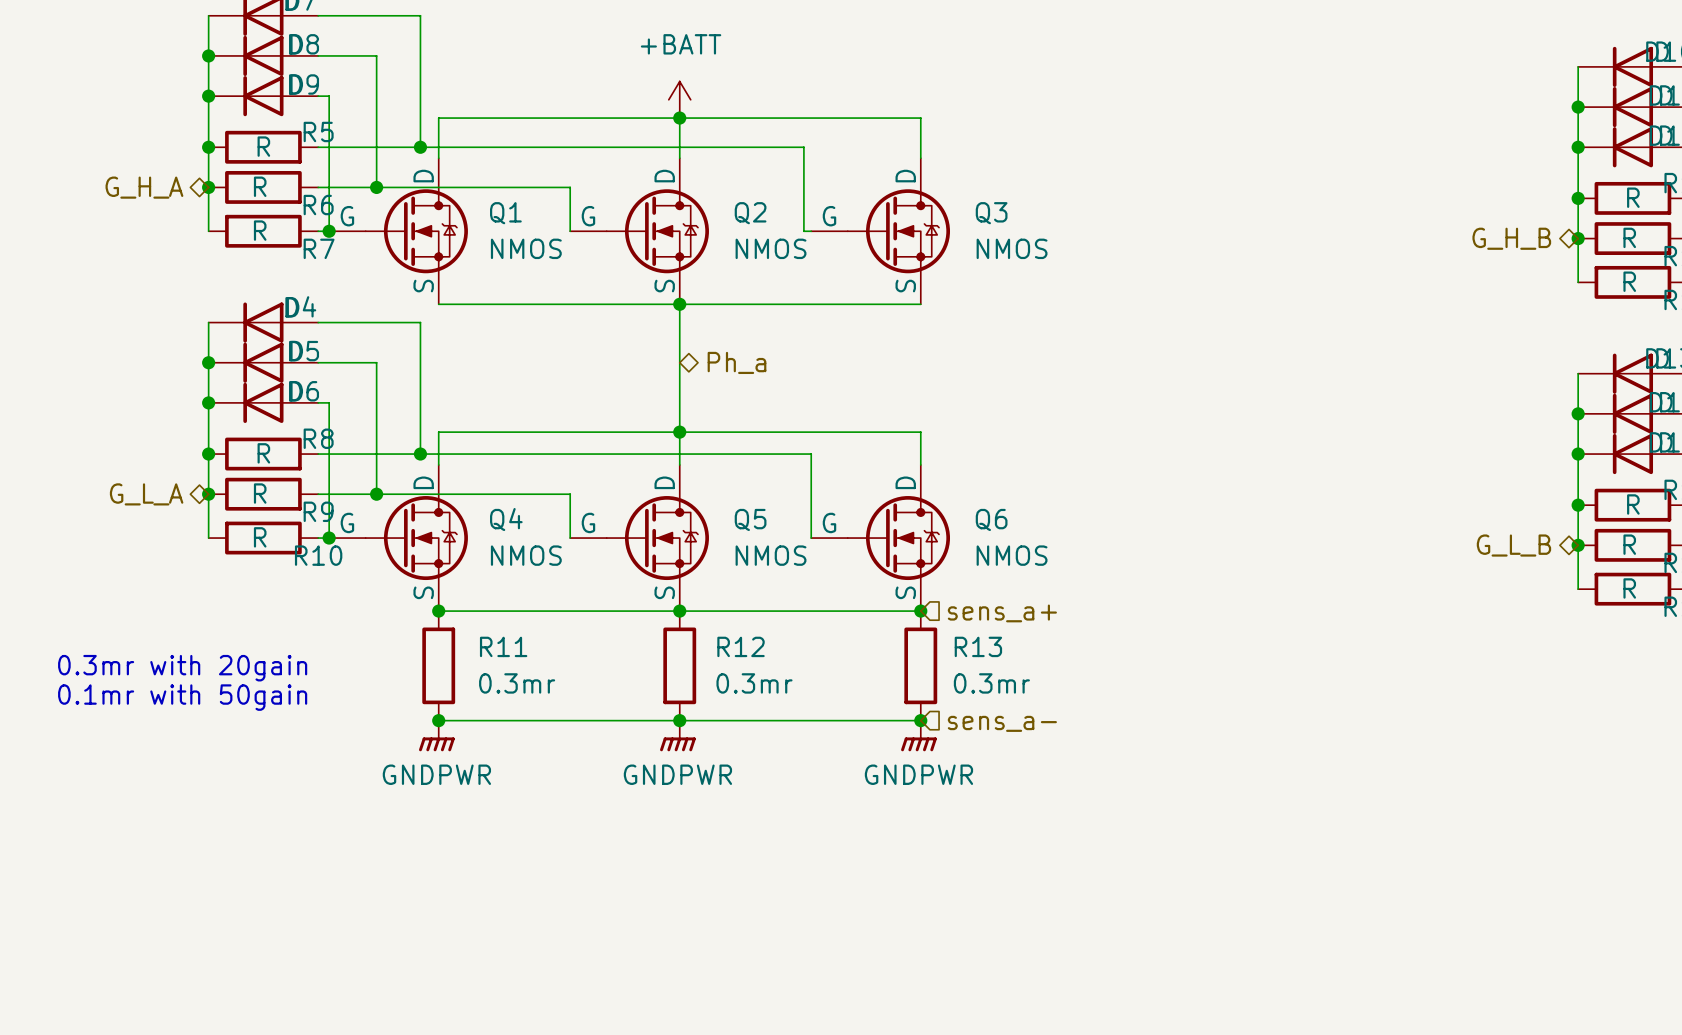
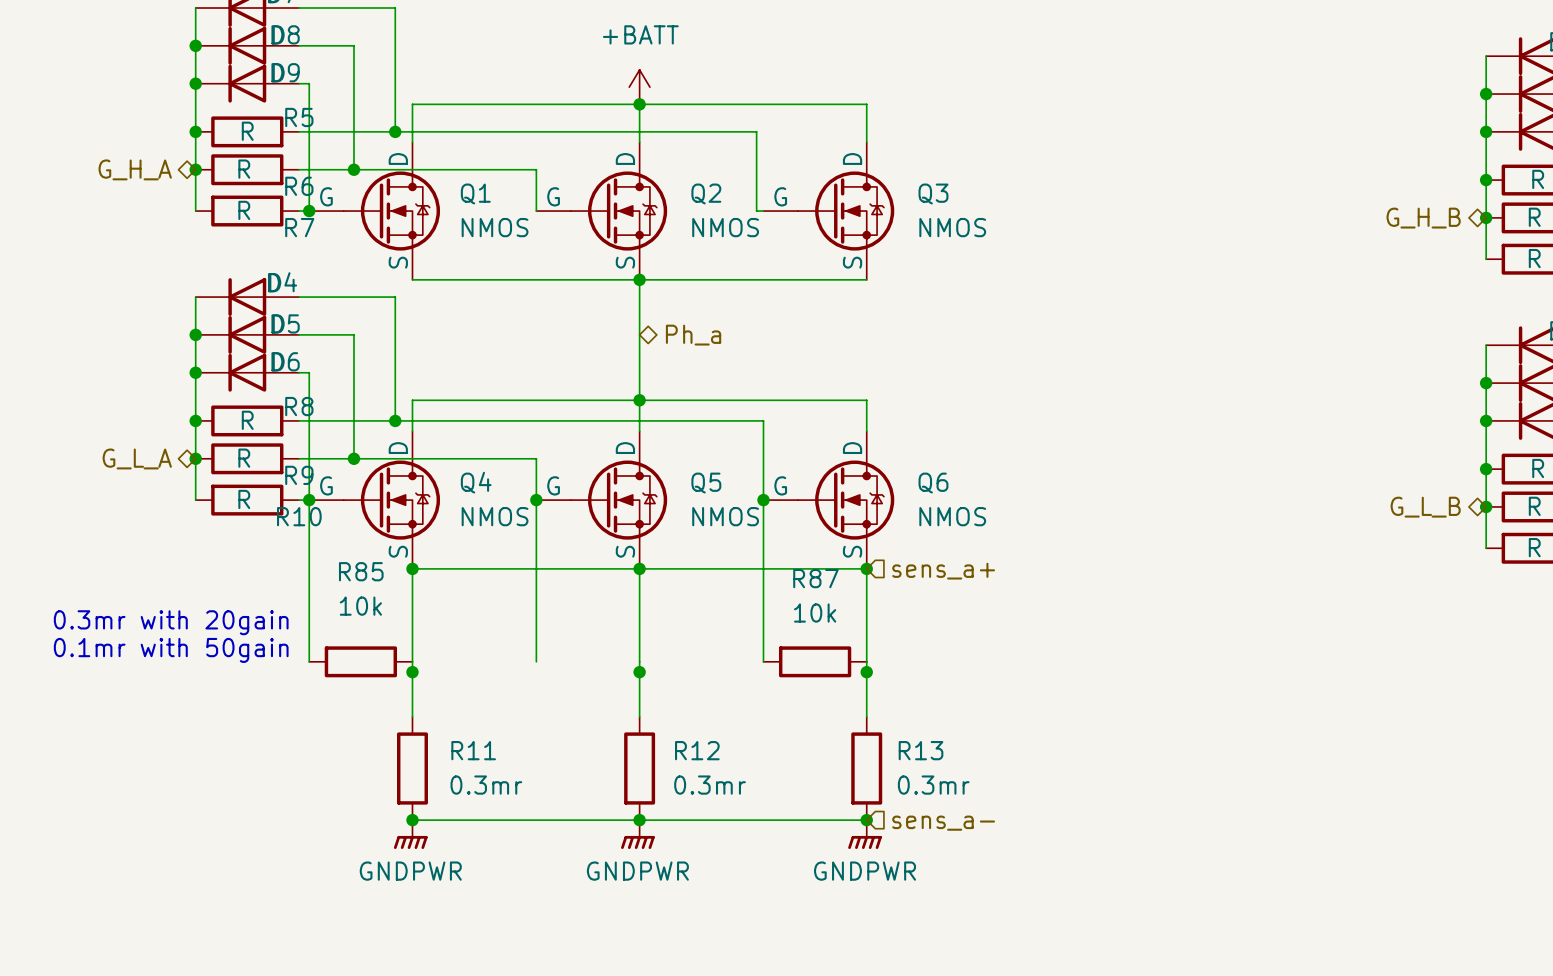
wire: none -> (309, 500) (309, 661)
wire: none -> (536, 500) (536, 661)
junction: none -> (536, 500)
wire: none -> (763, 500) (763, 661)
junction: none -> (763, 500)
wire: none -> (412, 568) (412, 716)
wire: none -> (639, 568) (639, 716)
wire: none -> (866, 568) (866, 716)
R11 position: (438, 665) -> (412, 768)
R12 position: (679, 665) -> (639, 768)
R13 position: (920, 665) -> (866, 768)
R85: none -> 10k (360, 661)
R87: none -> 10k (815, 661)
wire: (438, 720) (920, 720) -> (412, 820) (866, 820)
hierarchical label position: sens_a- (1002, 723) -> sens_a- (943, 823)
power symbol: GNDPWR (436, 735) -> none
power symbol: GNDPWR (677, 735) -> none
power symbol: GNDPWR (918, 735) -> none
junction: none -> (412, 820)
junction: none -> (639, 820)
junction: none -> (866, 820)
power symbol: none -> GNDPWR (410, 834)
power symbol: none -> GNDPWR (637, 834)
power symbol: none -> GNDPWR (865, 834)

